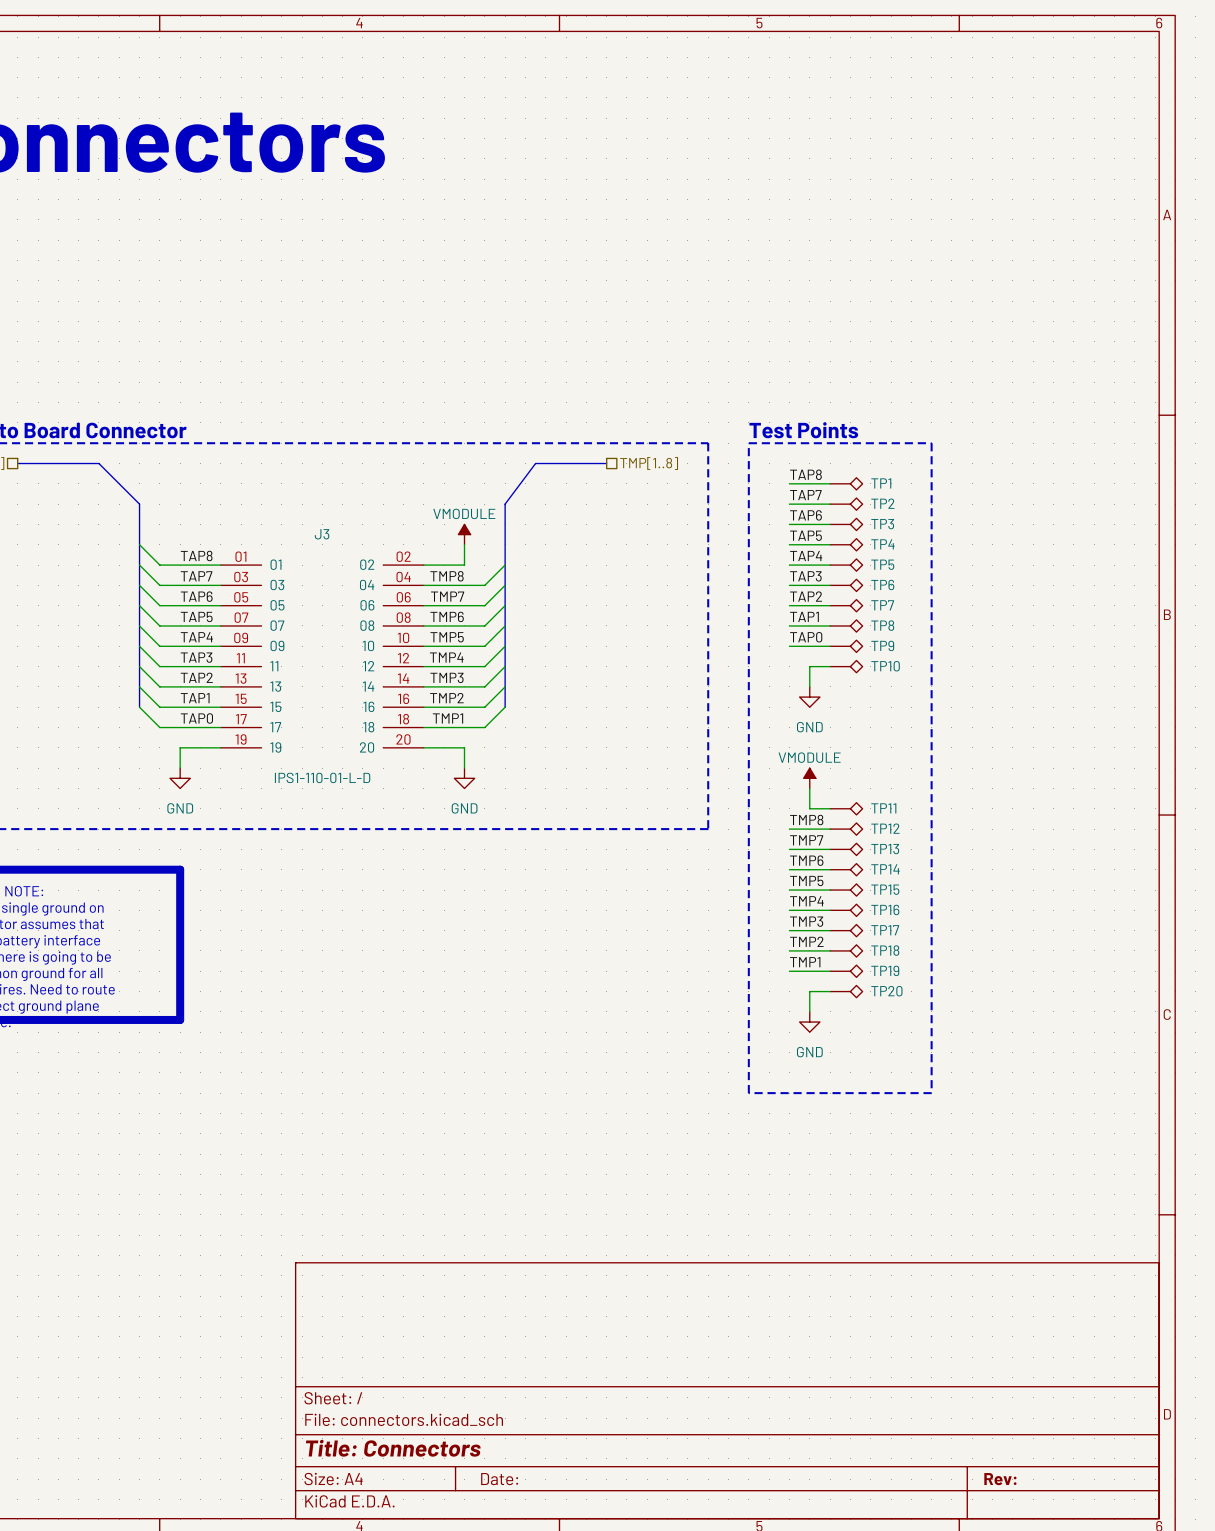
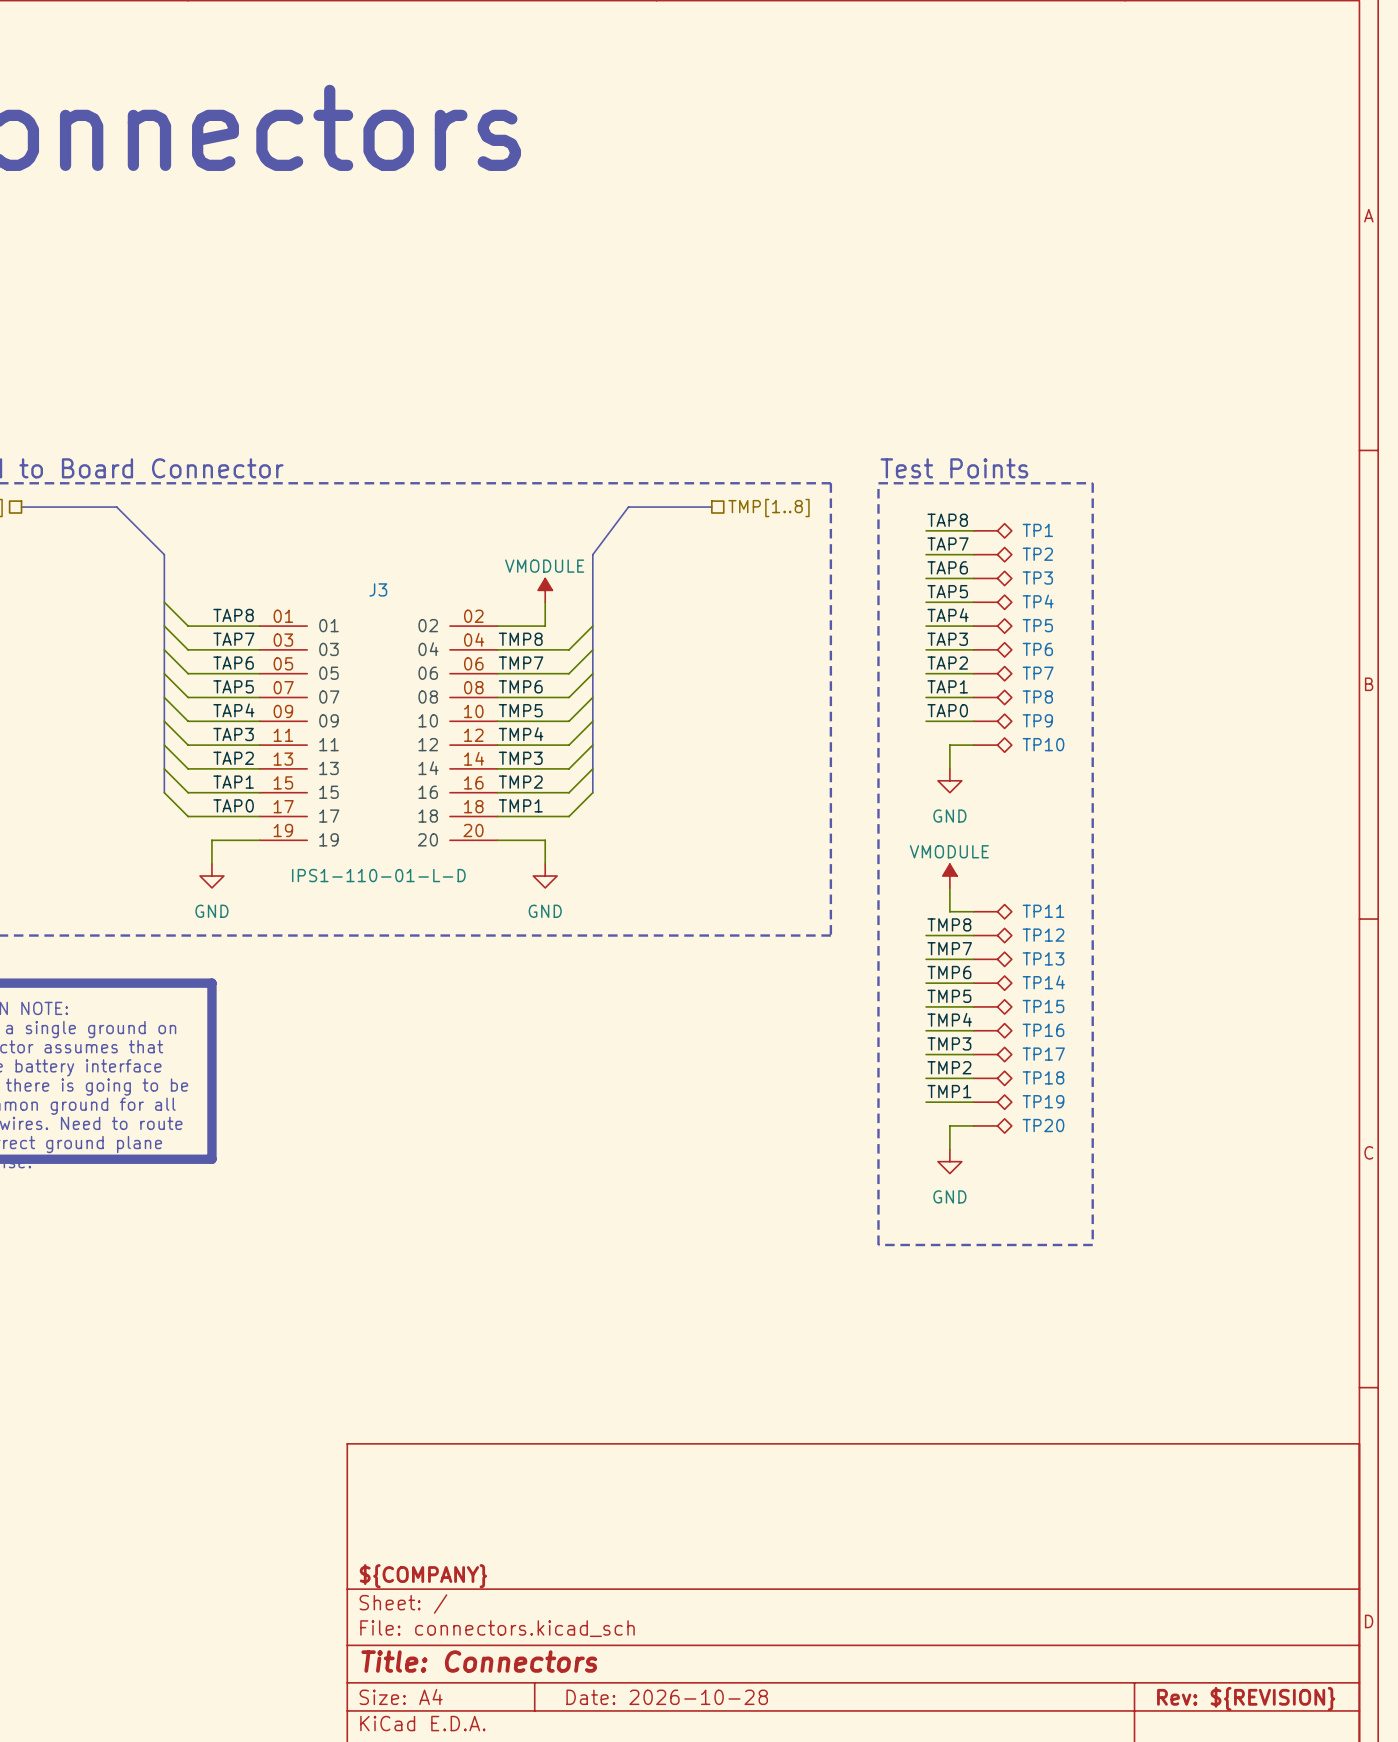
title block: none -> ${COMPANY} (423, 1576)
title block: Date: (499, 1479) -> Date: 2026-10-28 (667, 1697)
title block: Rev: (1000, 1479) -> Rev: ${REVISION} (1246, 1698)

